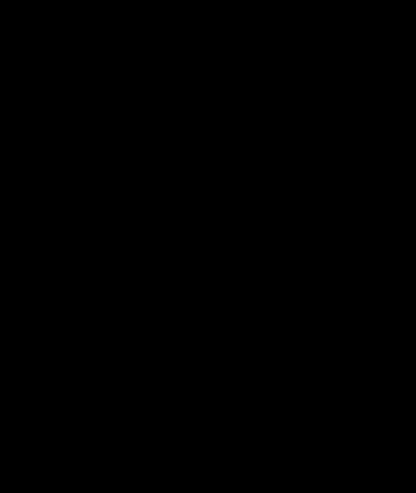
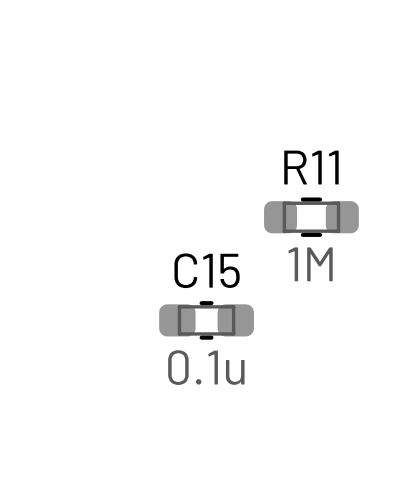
R11: none -> 1M (311, 217)
C15: none -> 0.1u (206, 320)

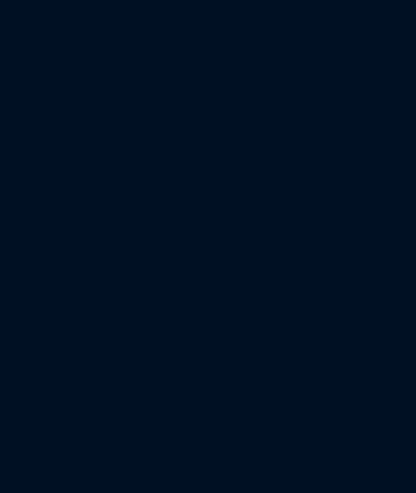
R11: 1M (311, 217) -> none
C15: 0.1u (206, 320) -> none

